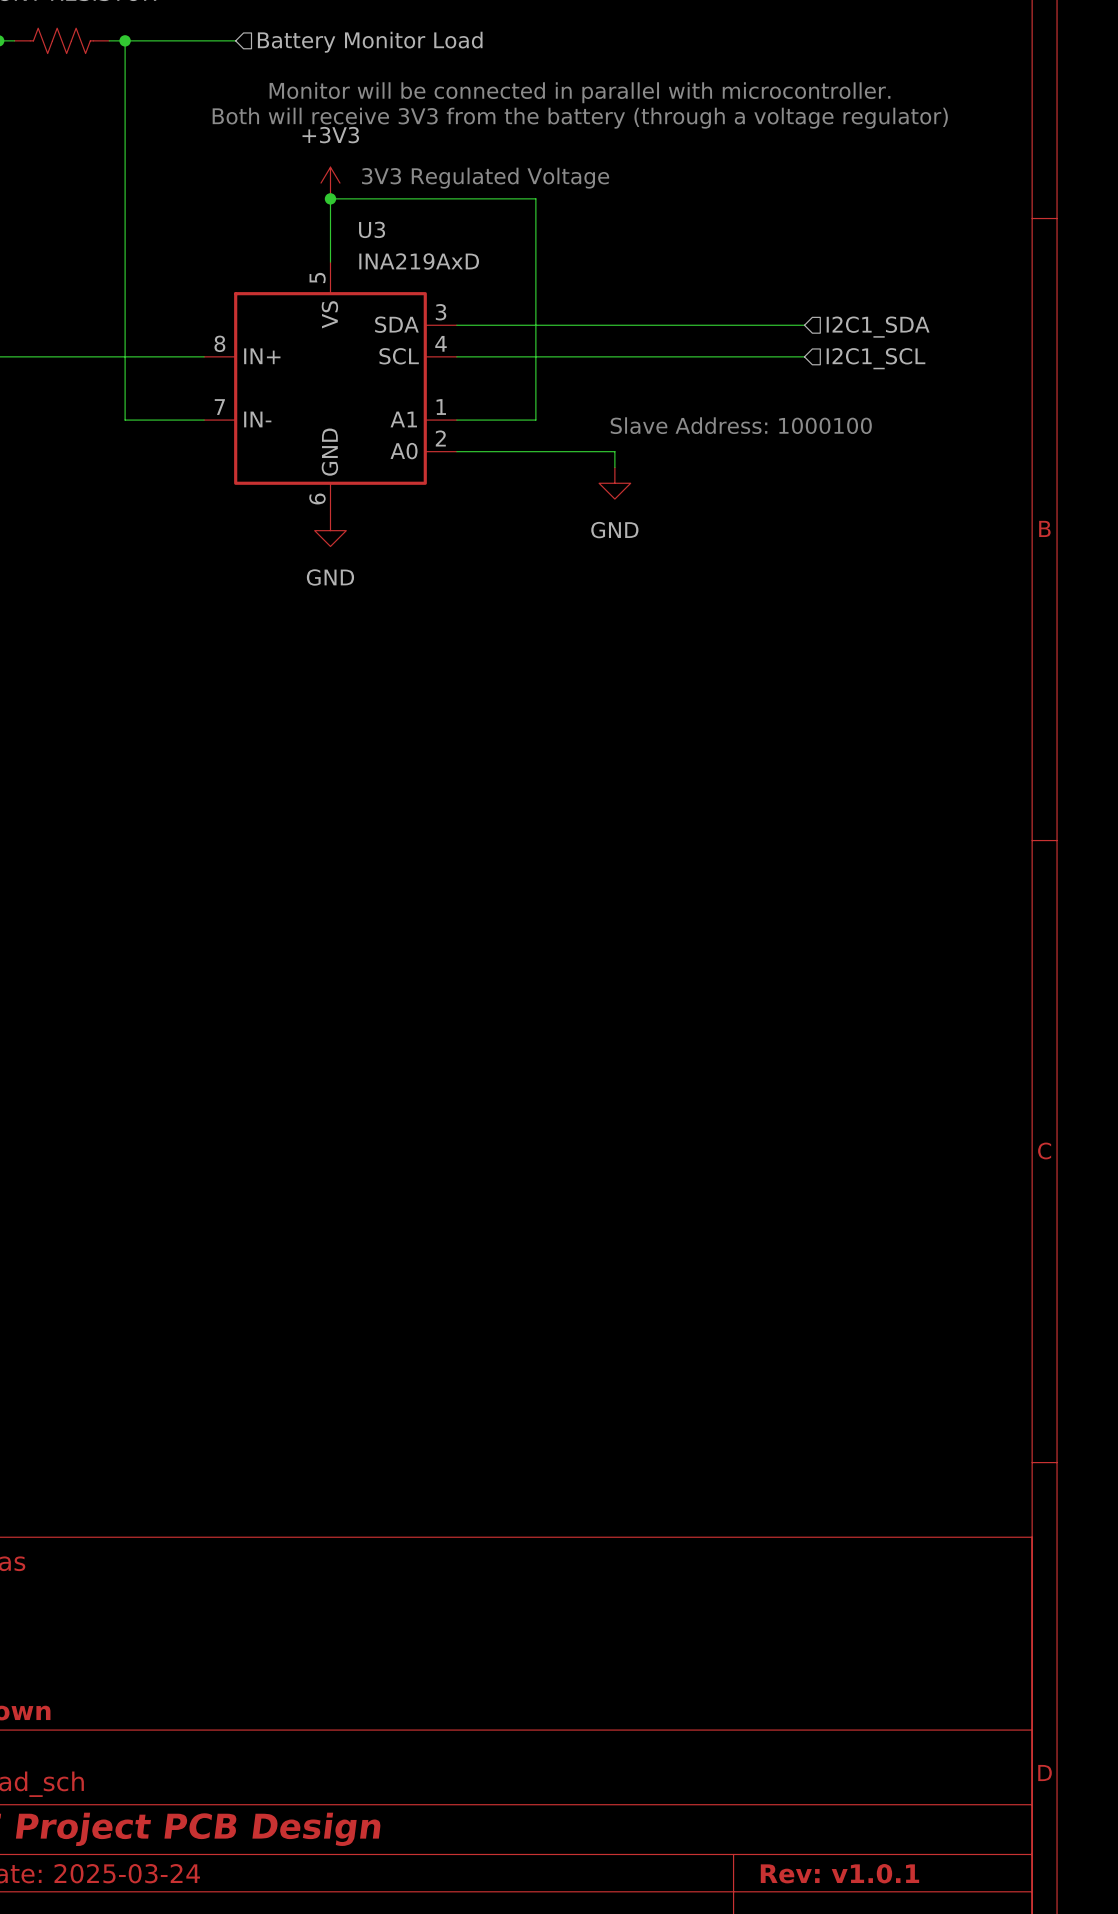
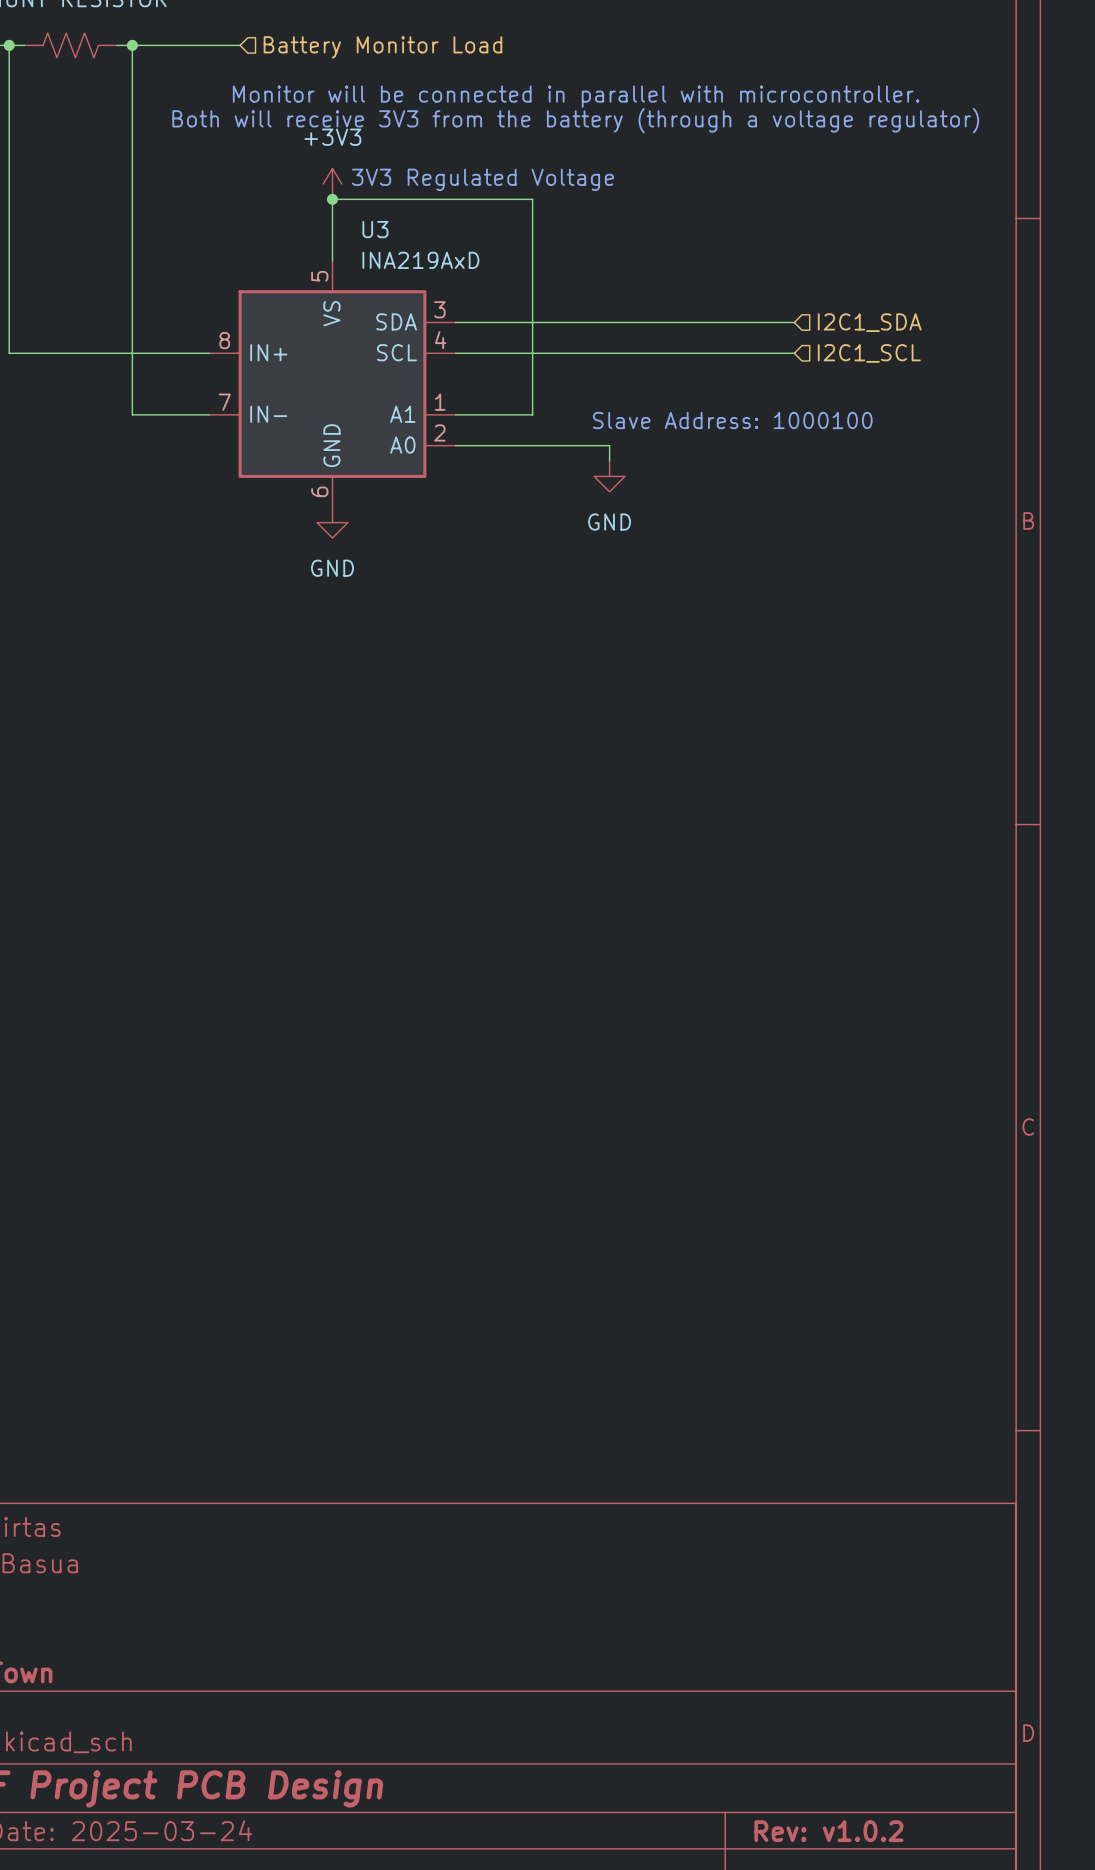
title block: Rev: v1.0.1 (839, 1873) -> Rev: v1.0.2 (828, 1831)

